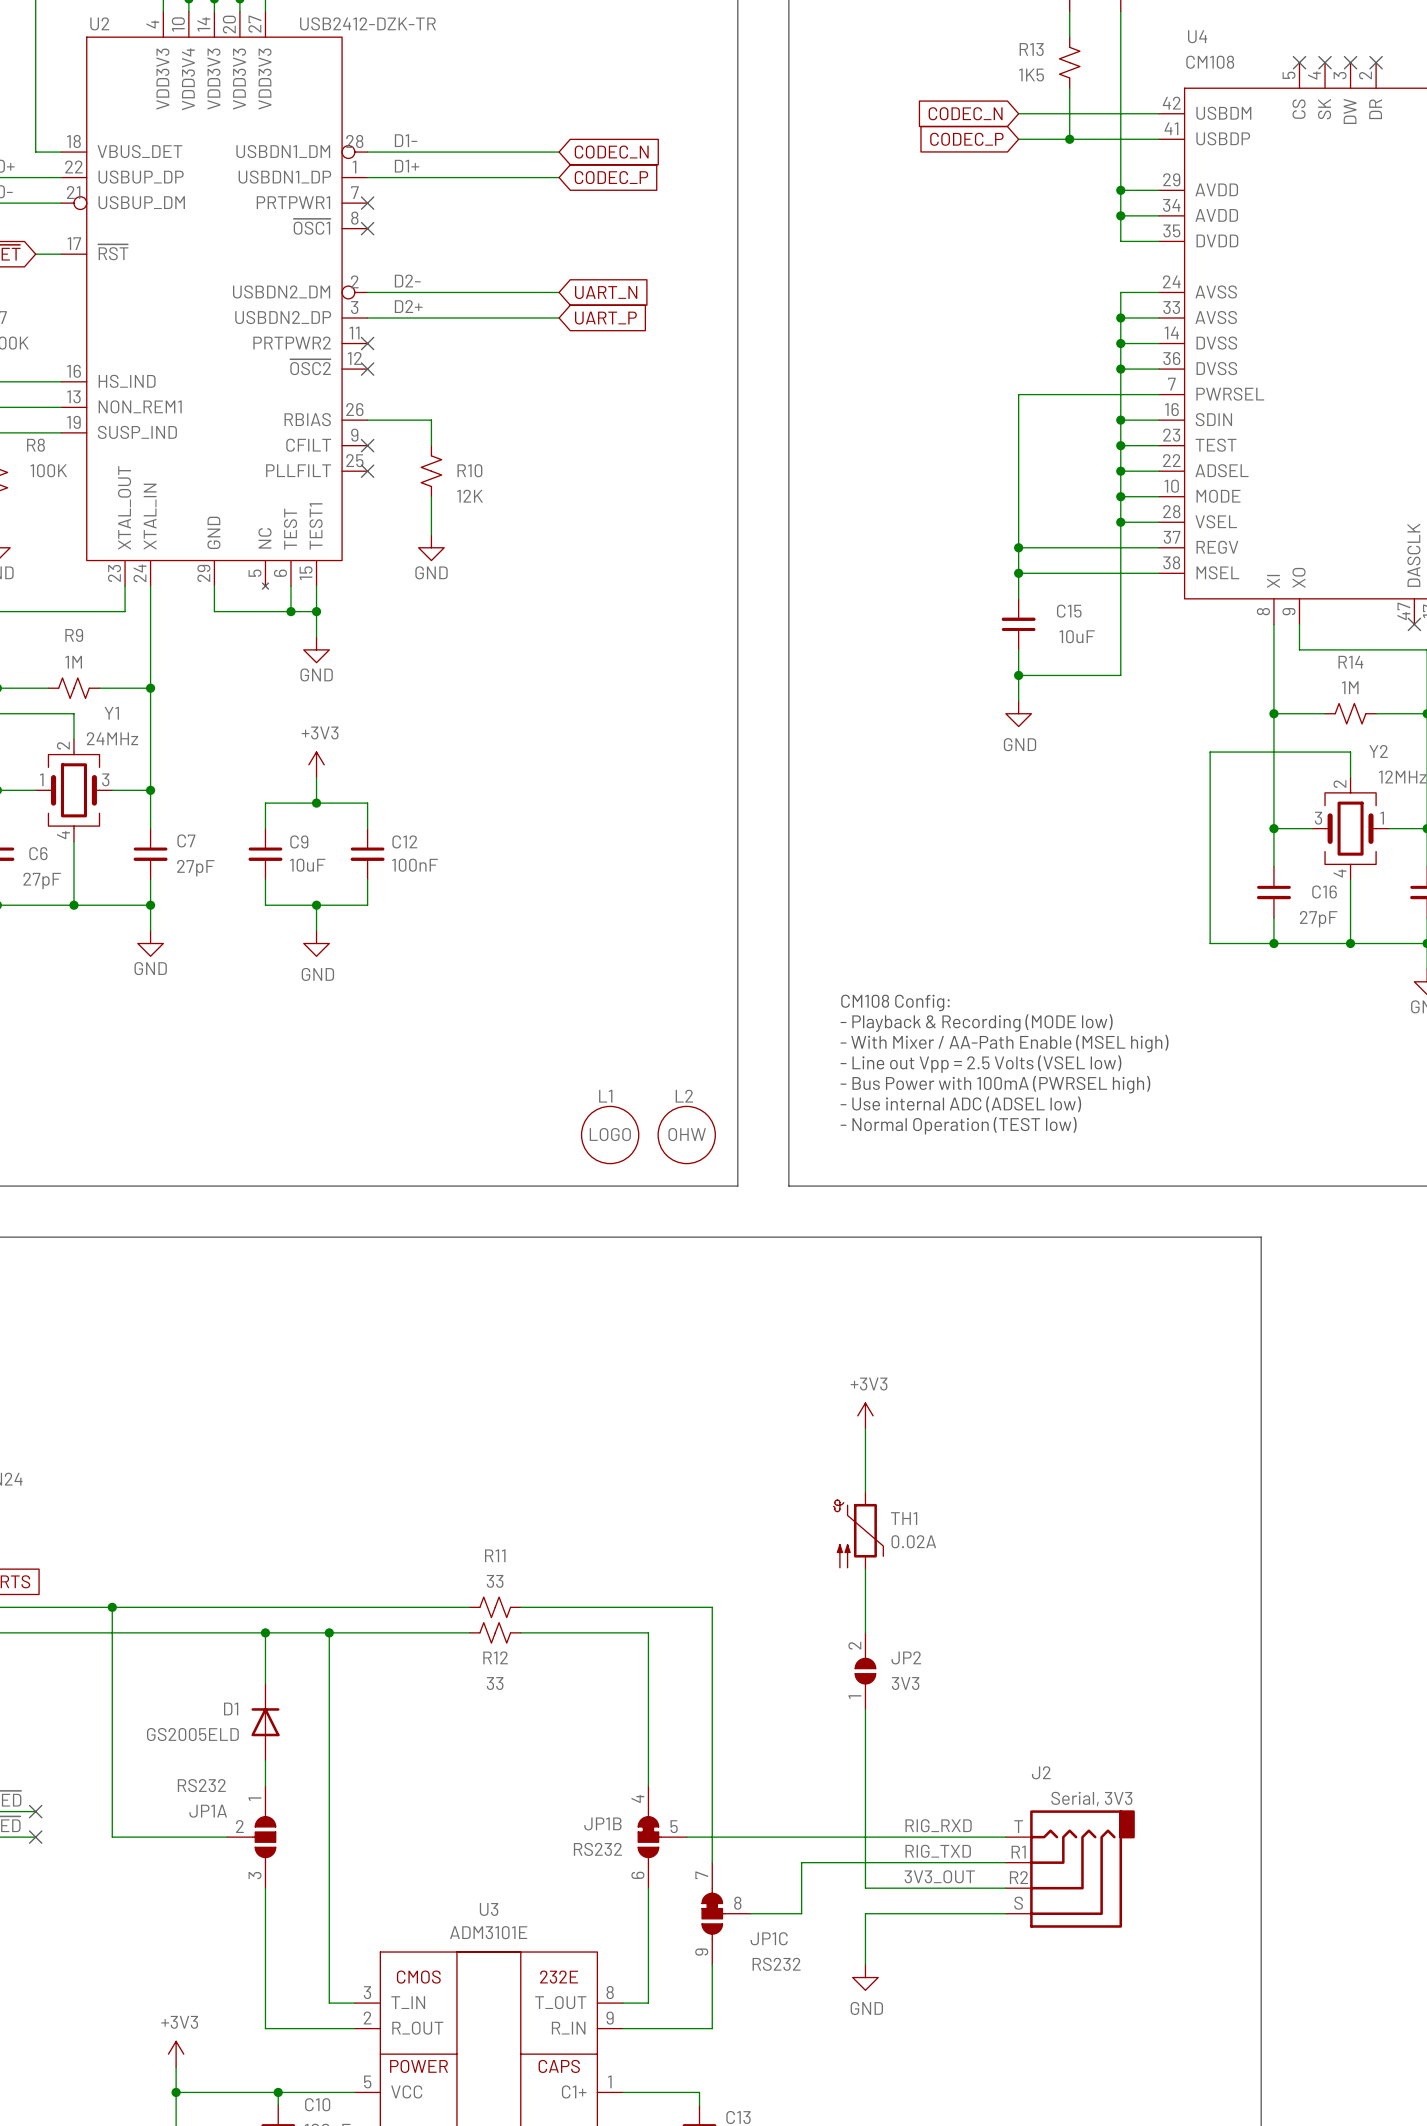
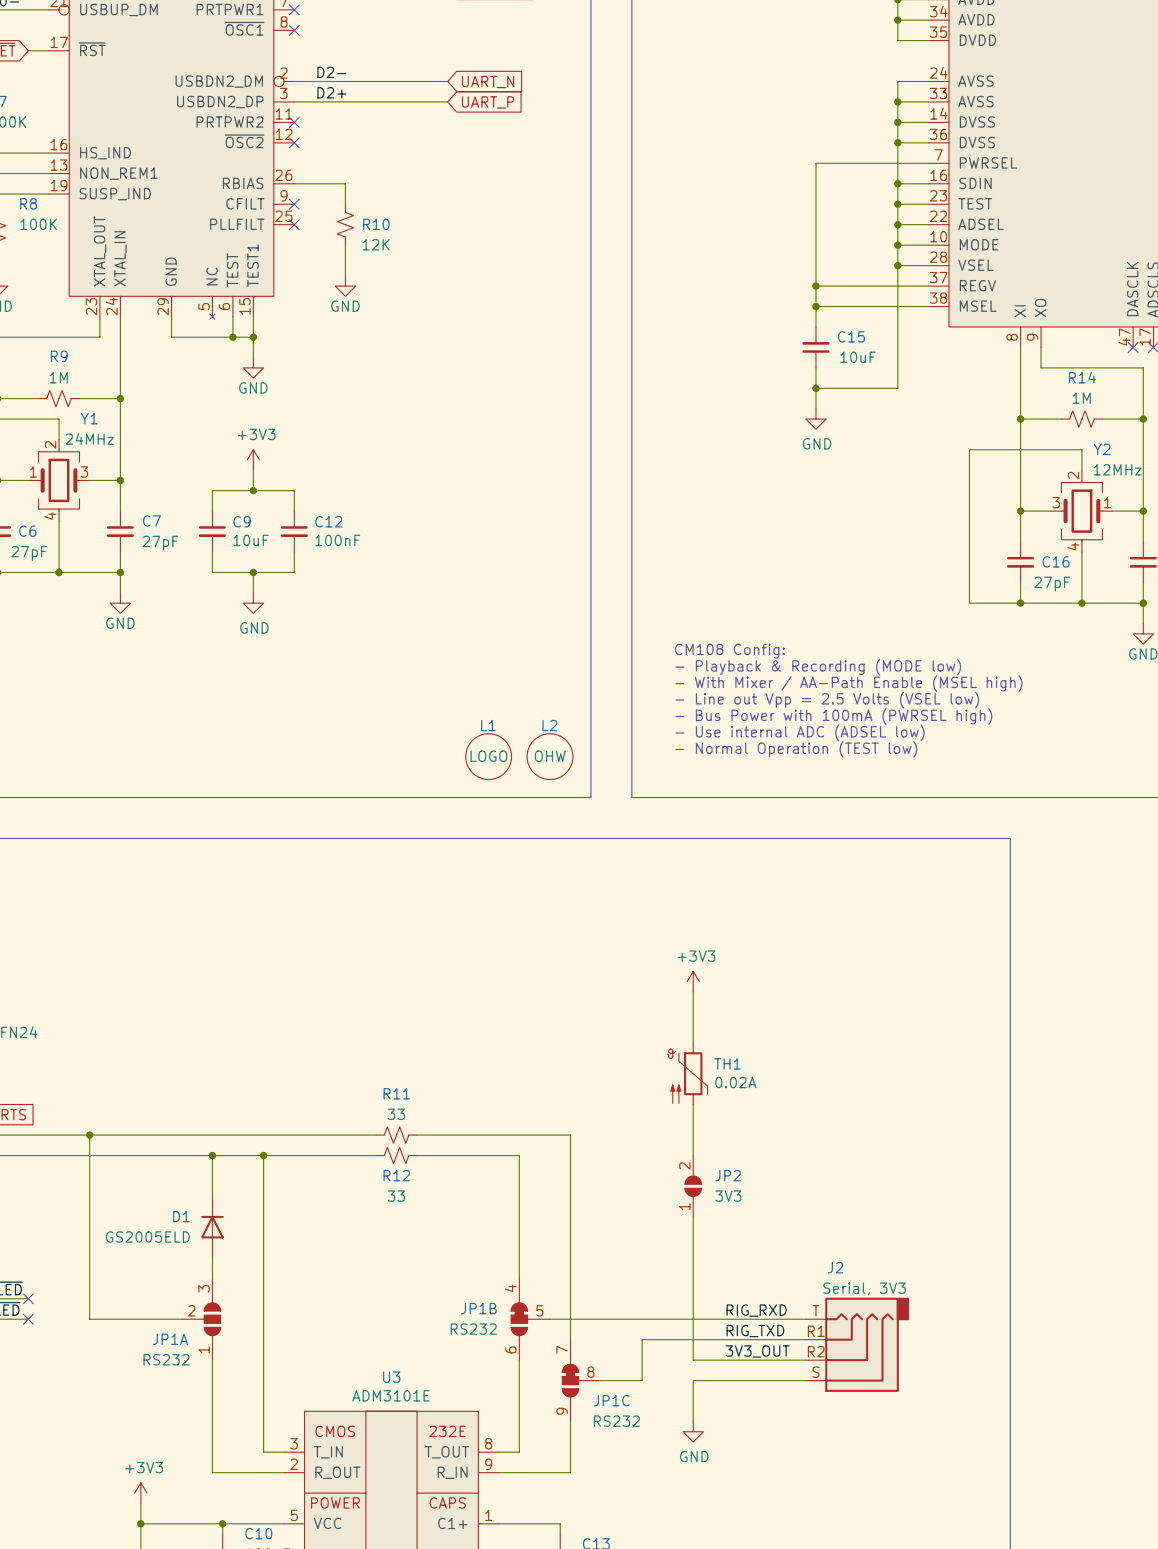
JP1A flip: as is (264, 1837) -> up-down (211, 1319)

